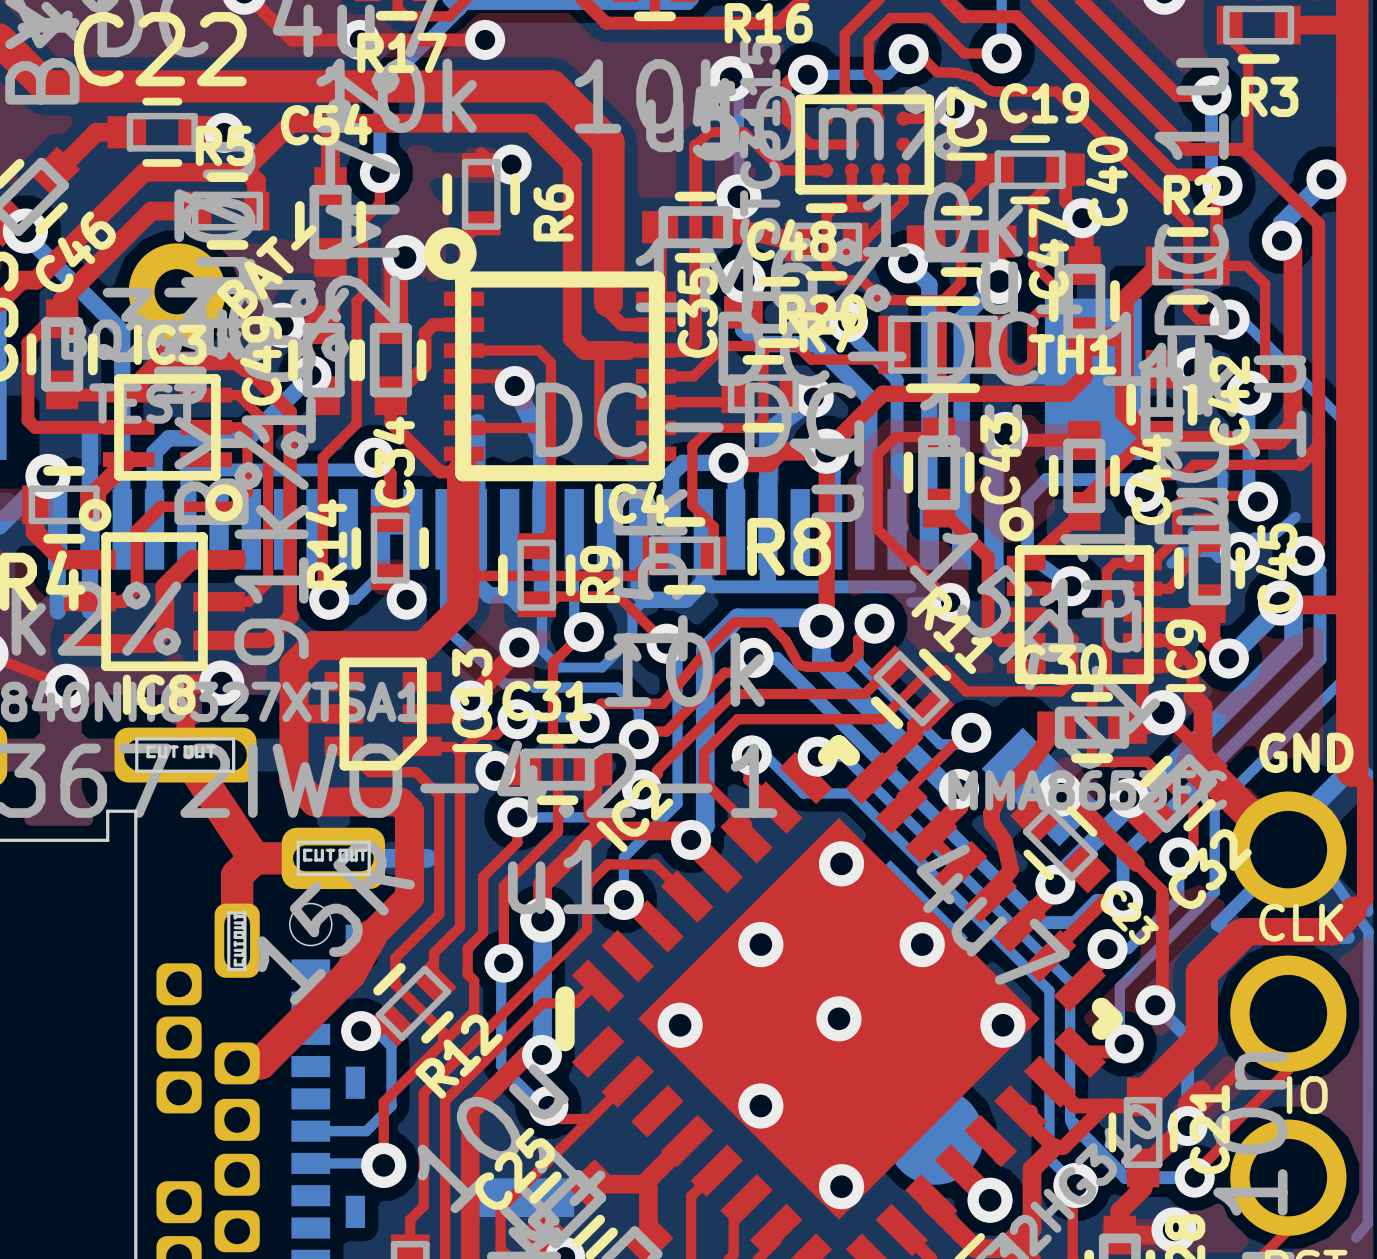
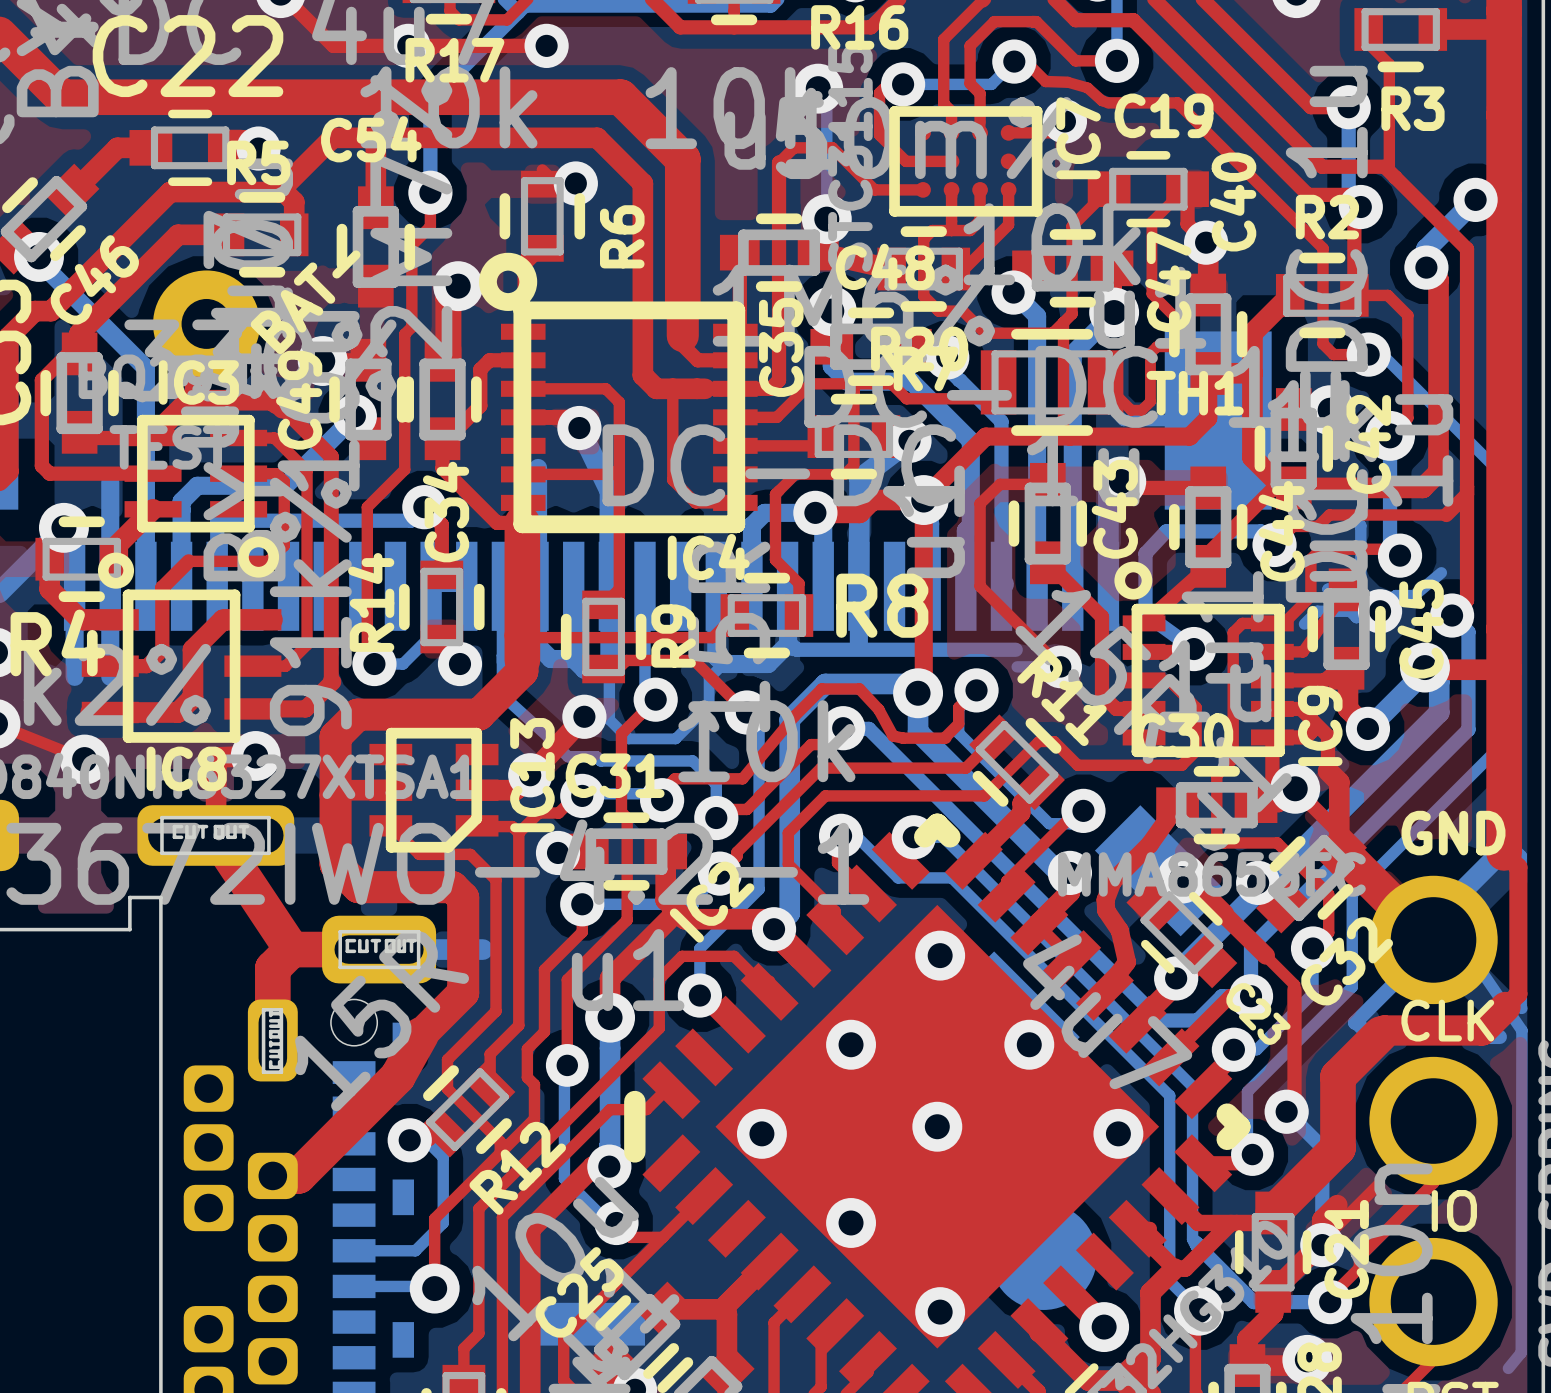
top track: (943, 300) (941, 302) (941, 388) (946, 393) (959, 393) -> (1063, 322) (1063, 430) (1069, 436)

